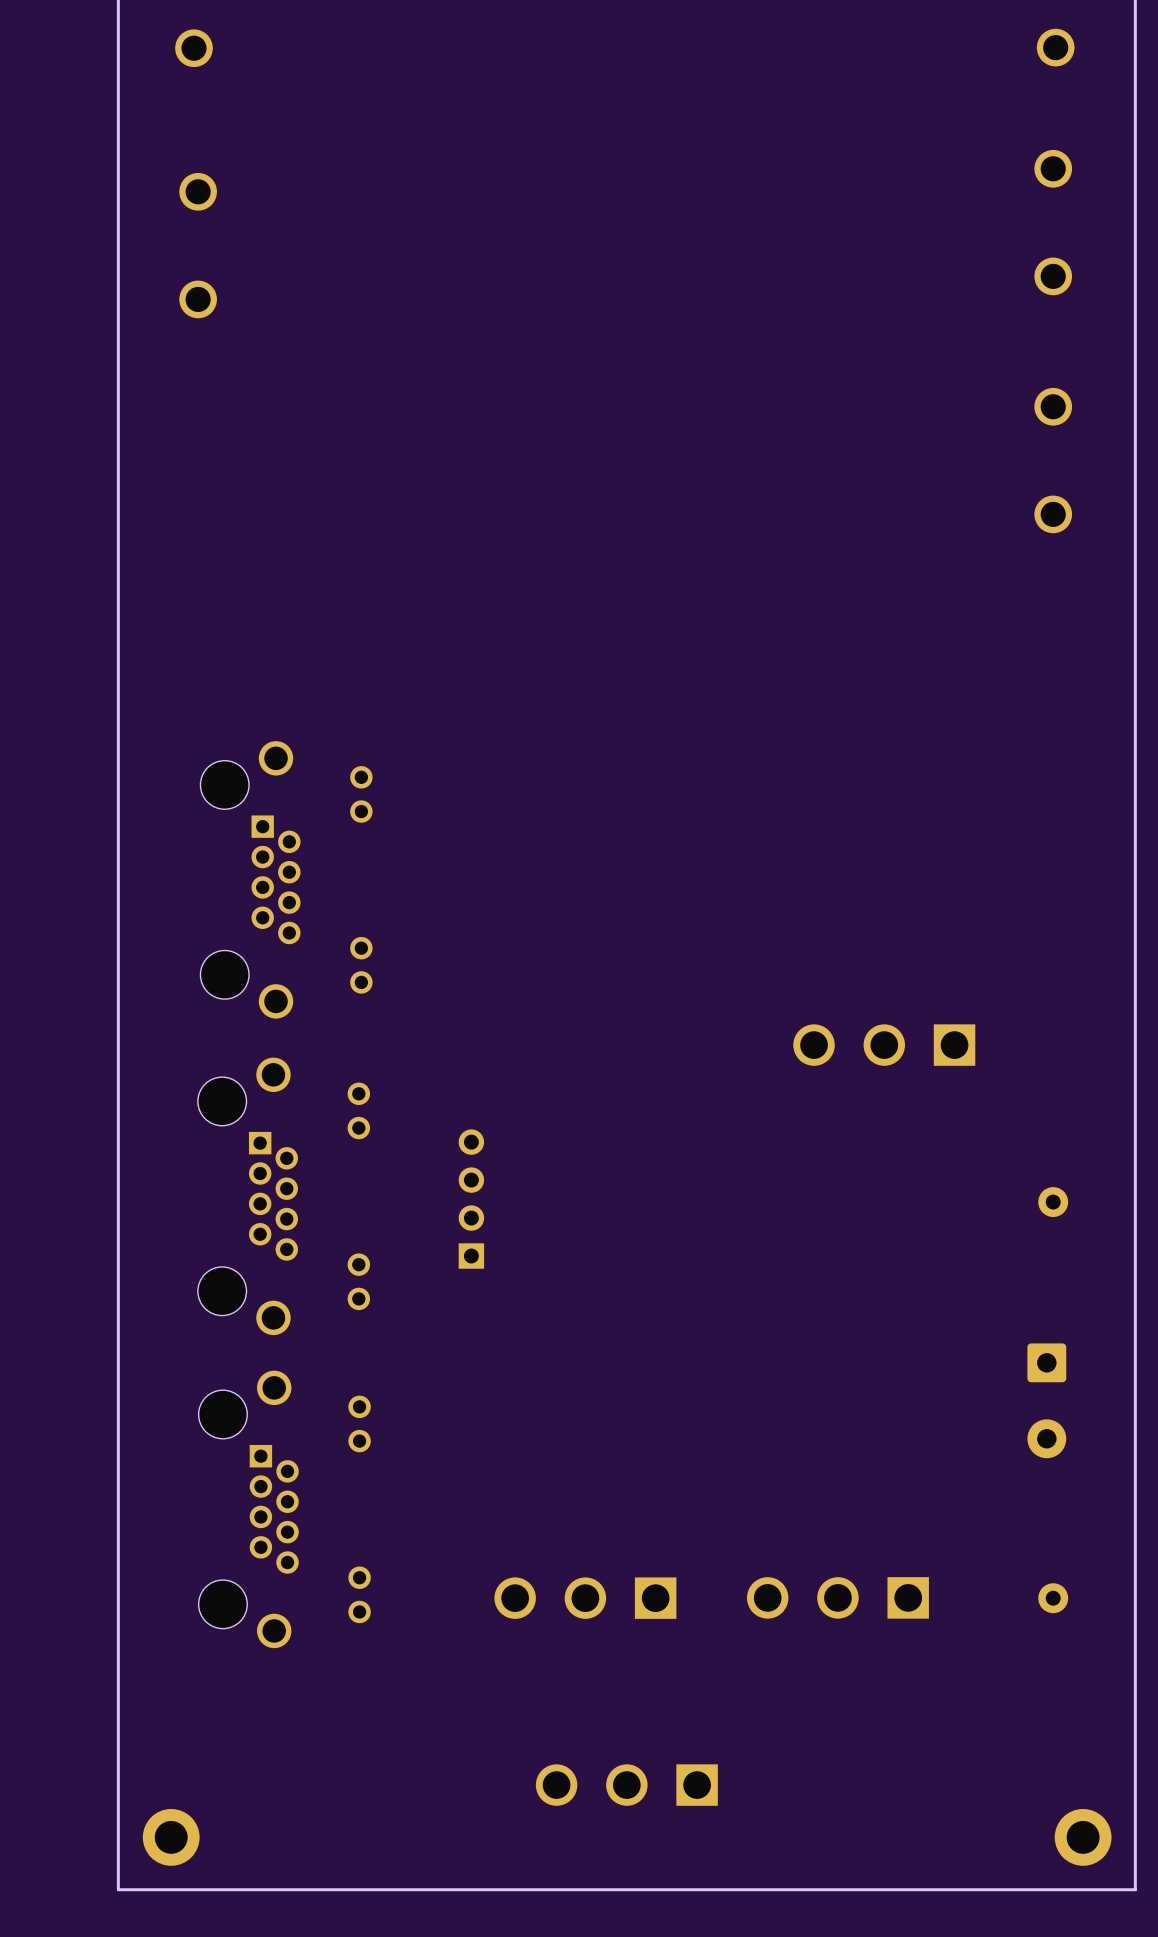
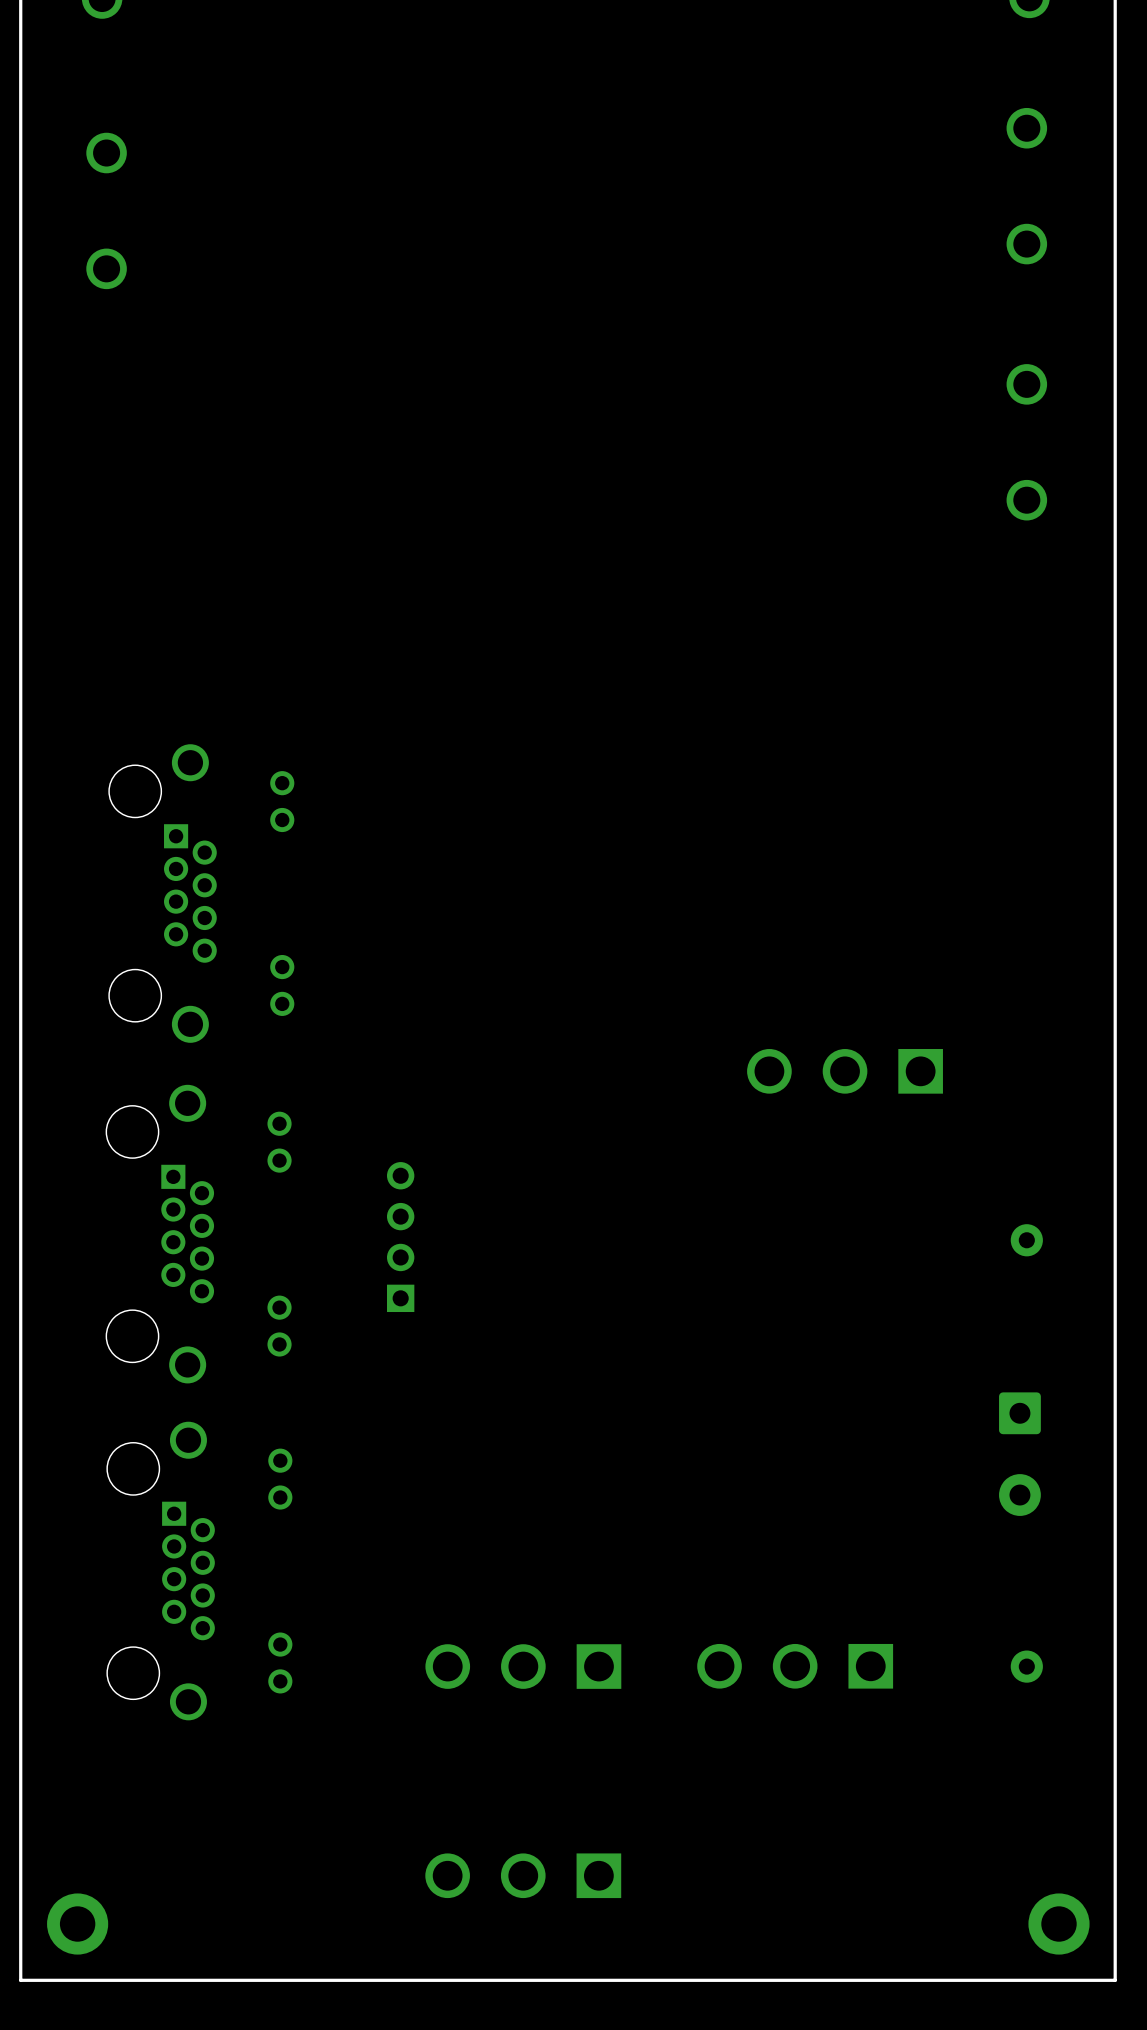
part position: (626, 1785) -> (523, 1875)

